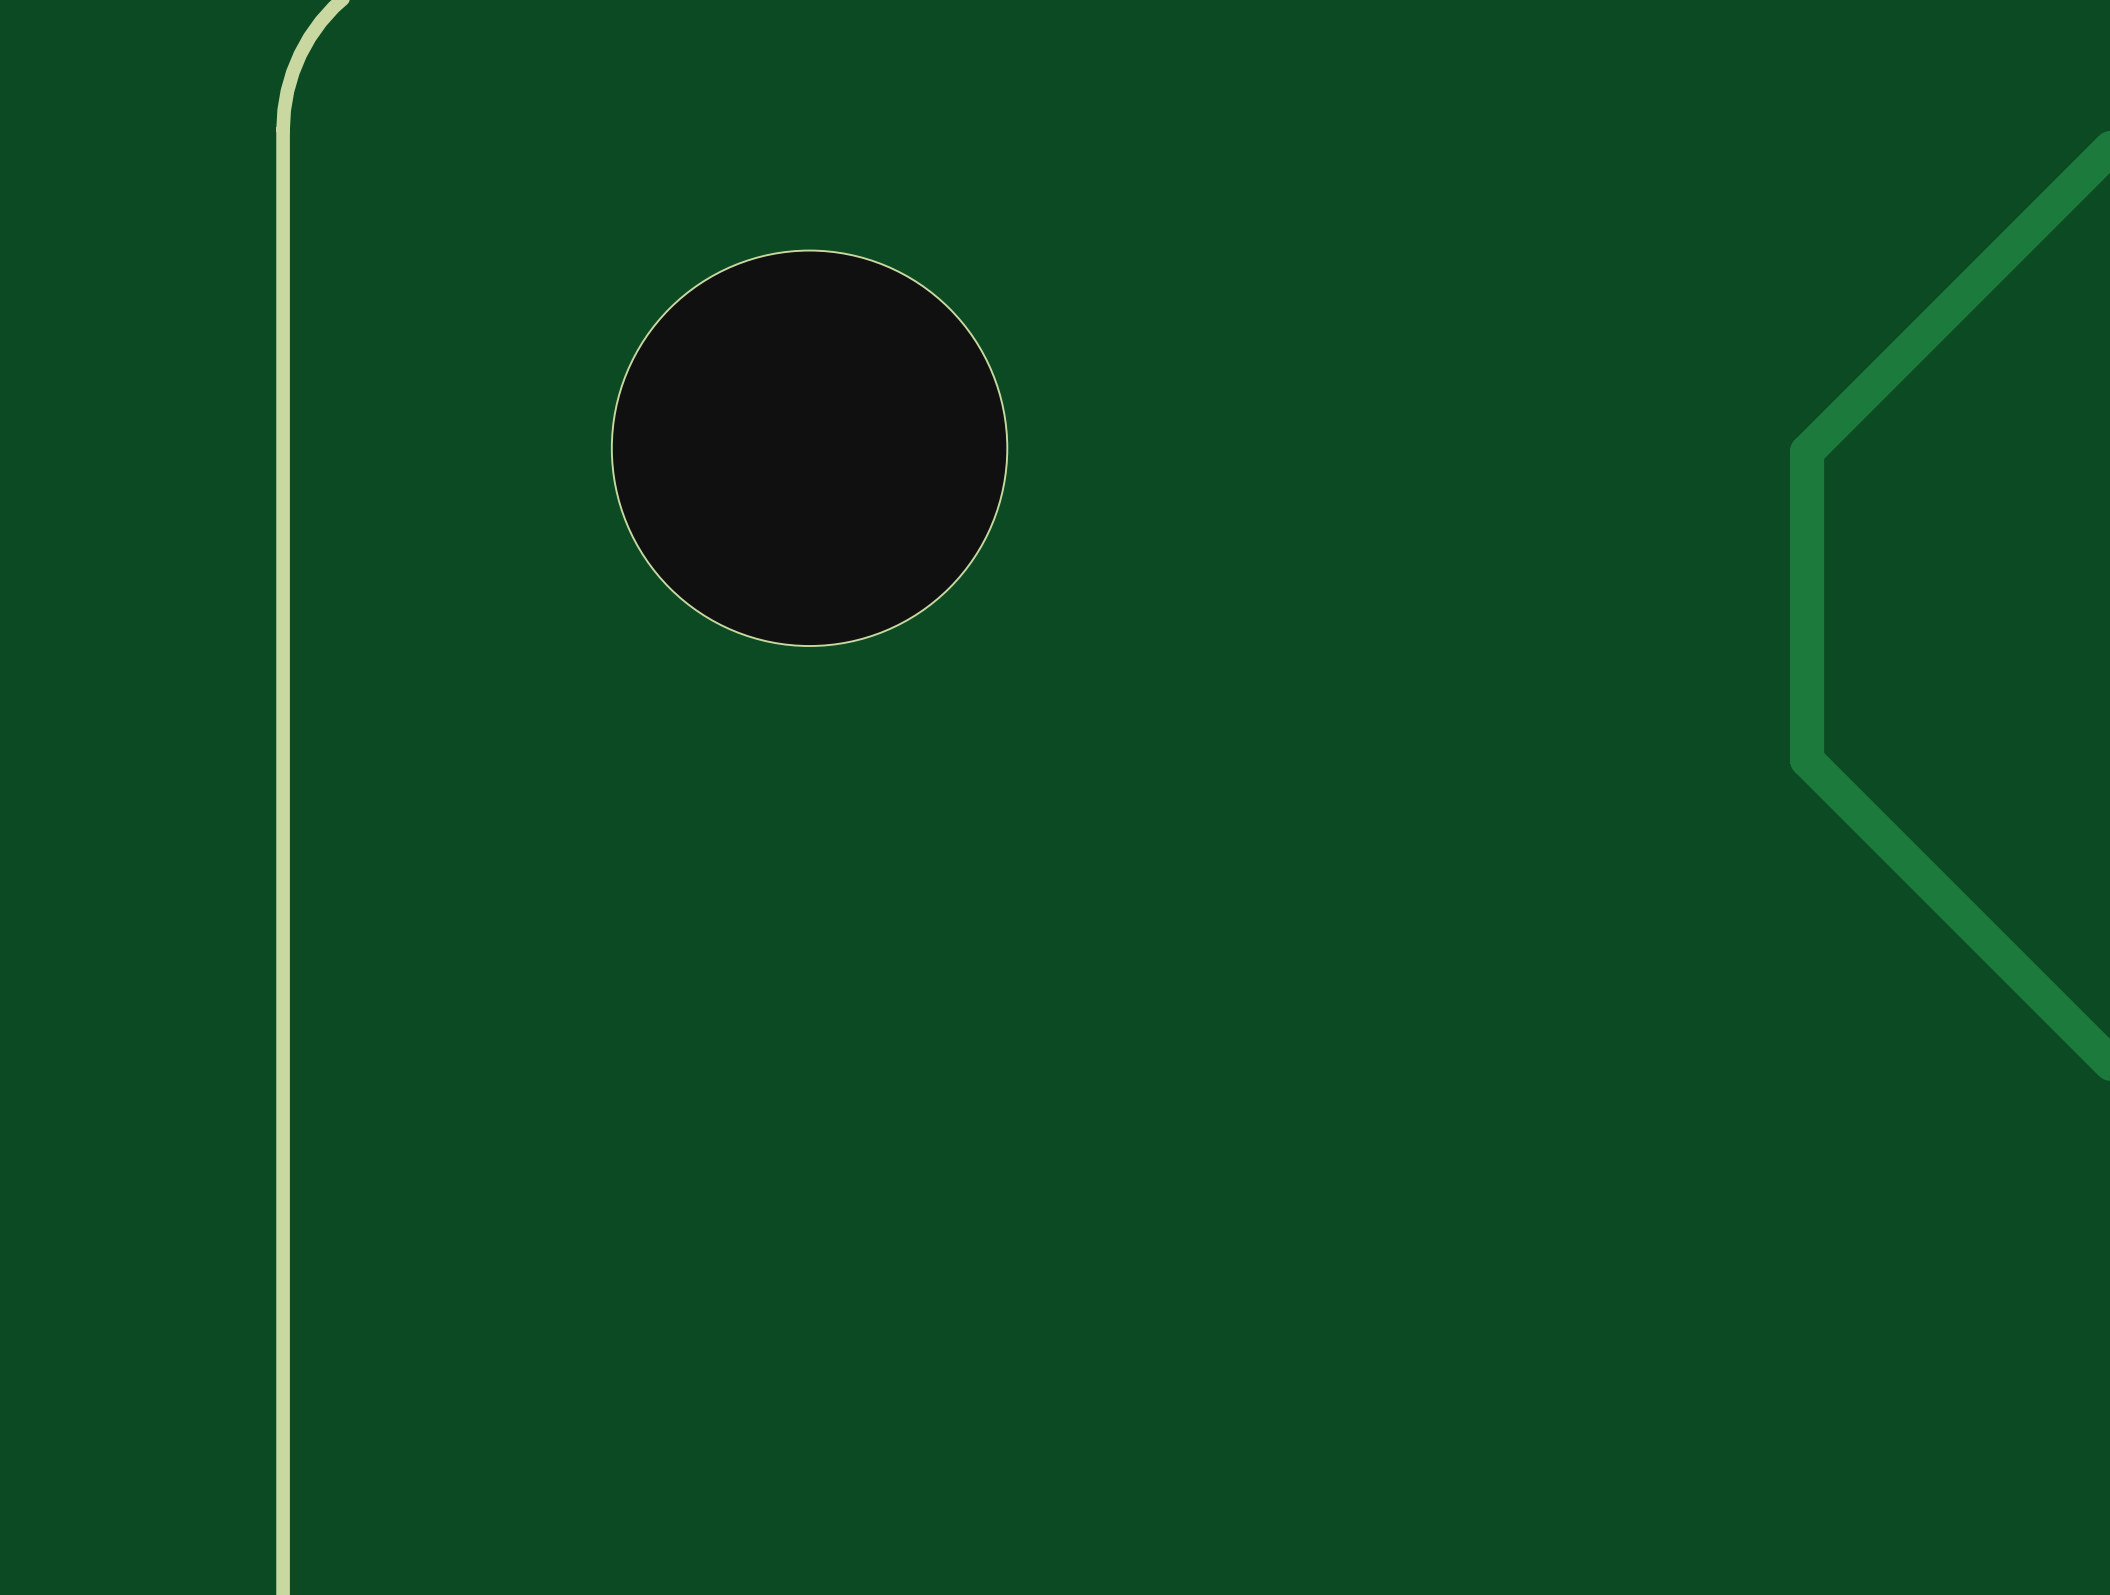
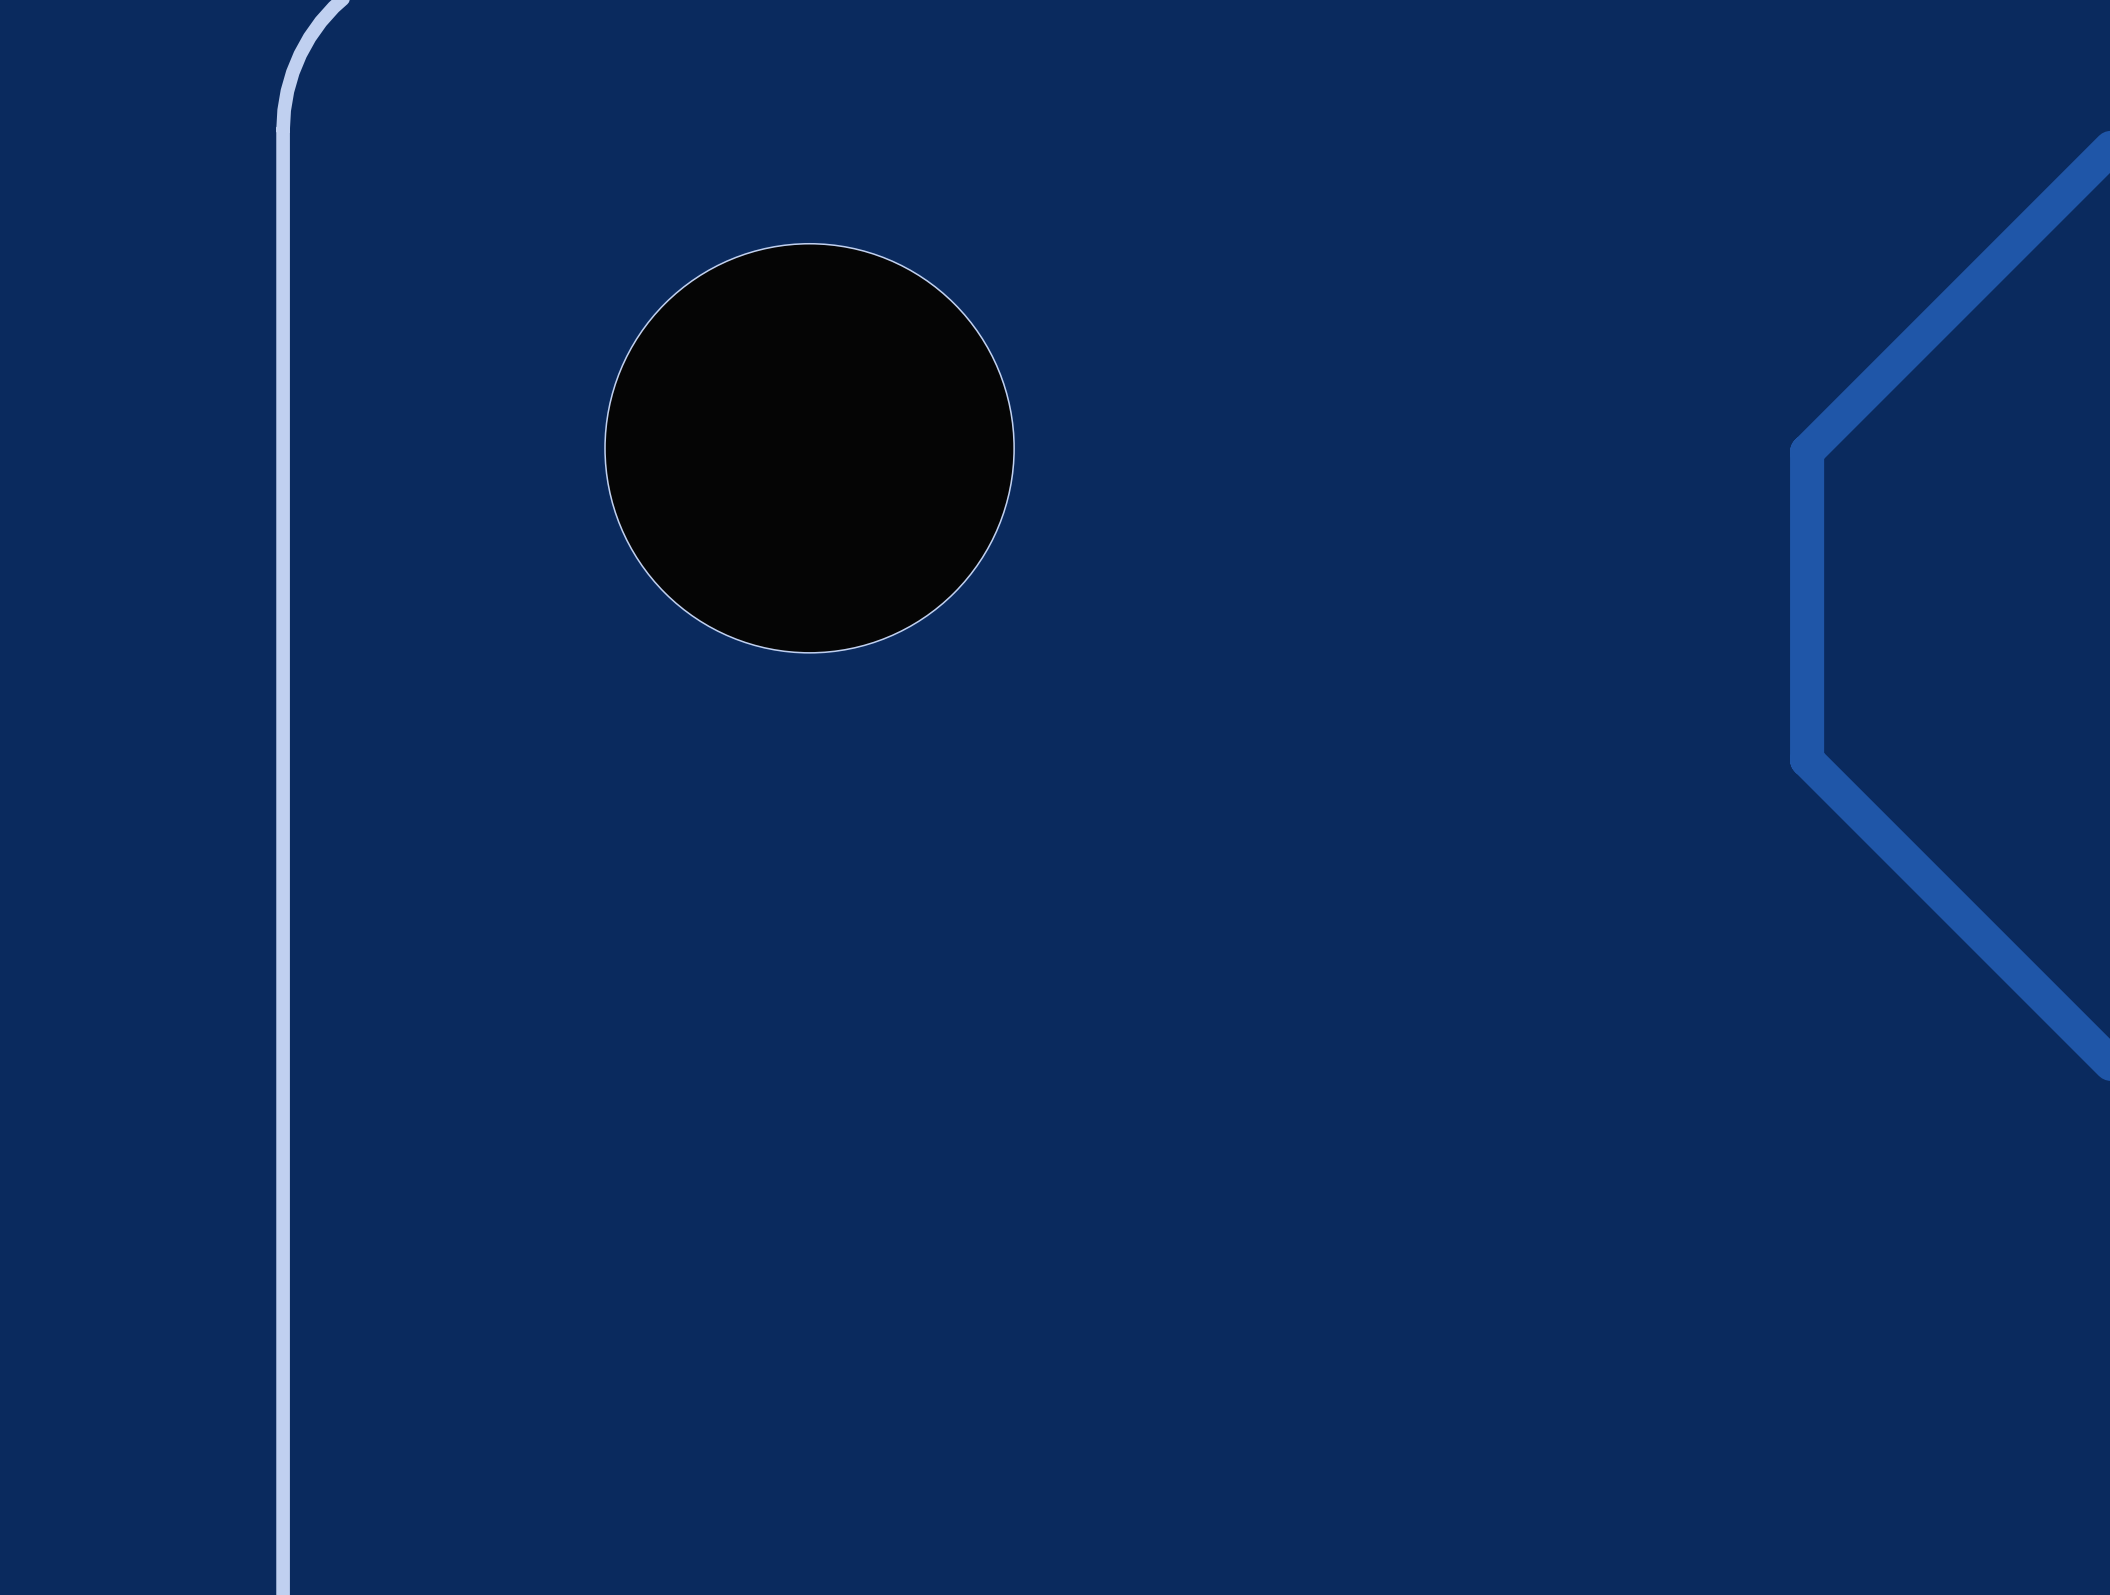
part footprint: [611, 250, 1008, 647] -> [605, 243, 1015, 653]

